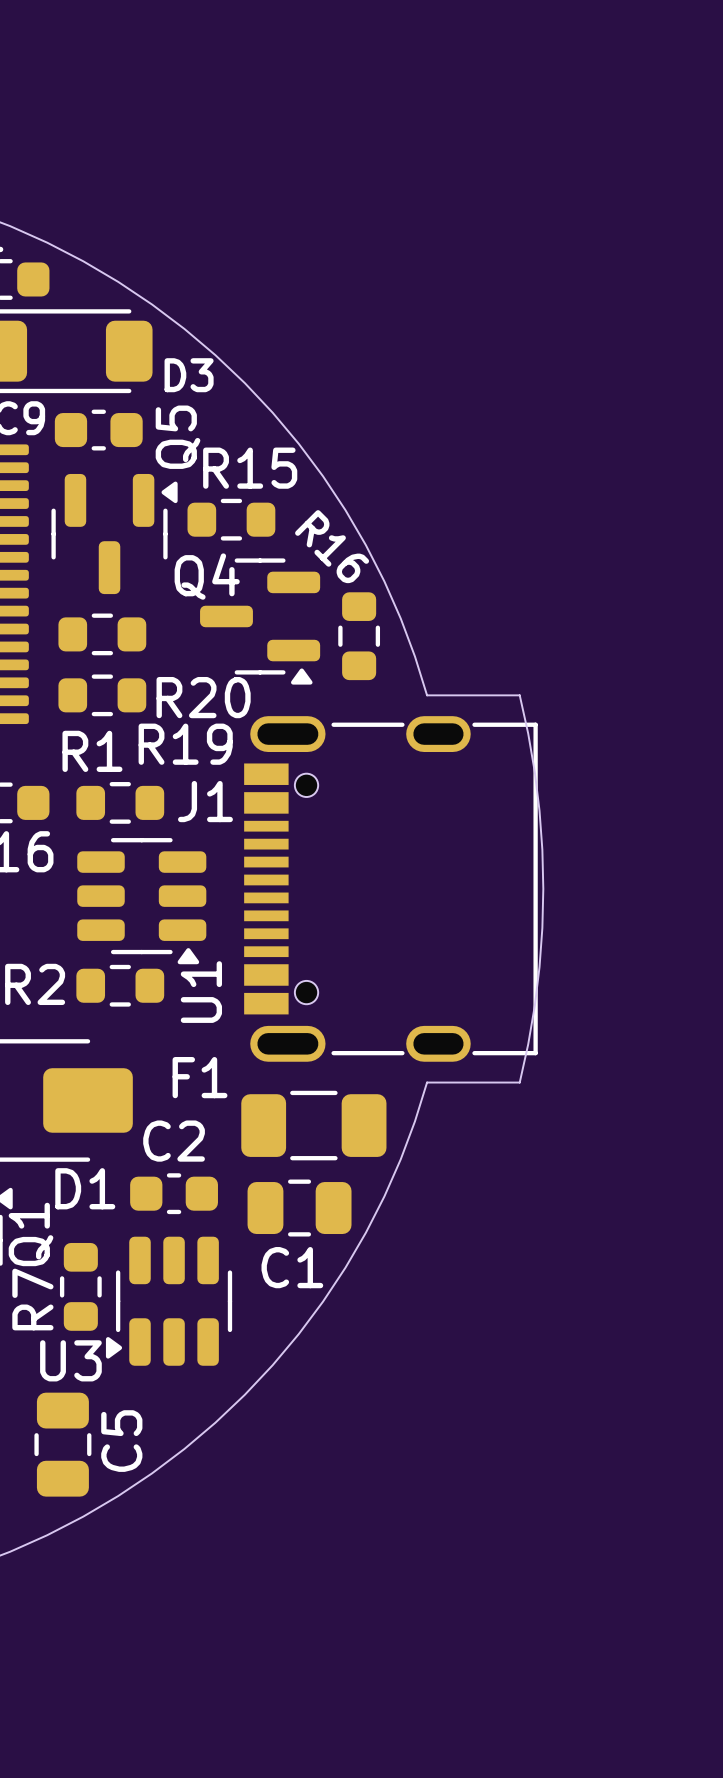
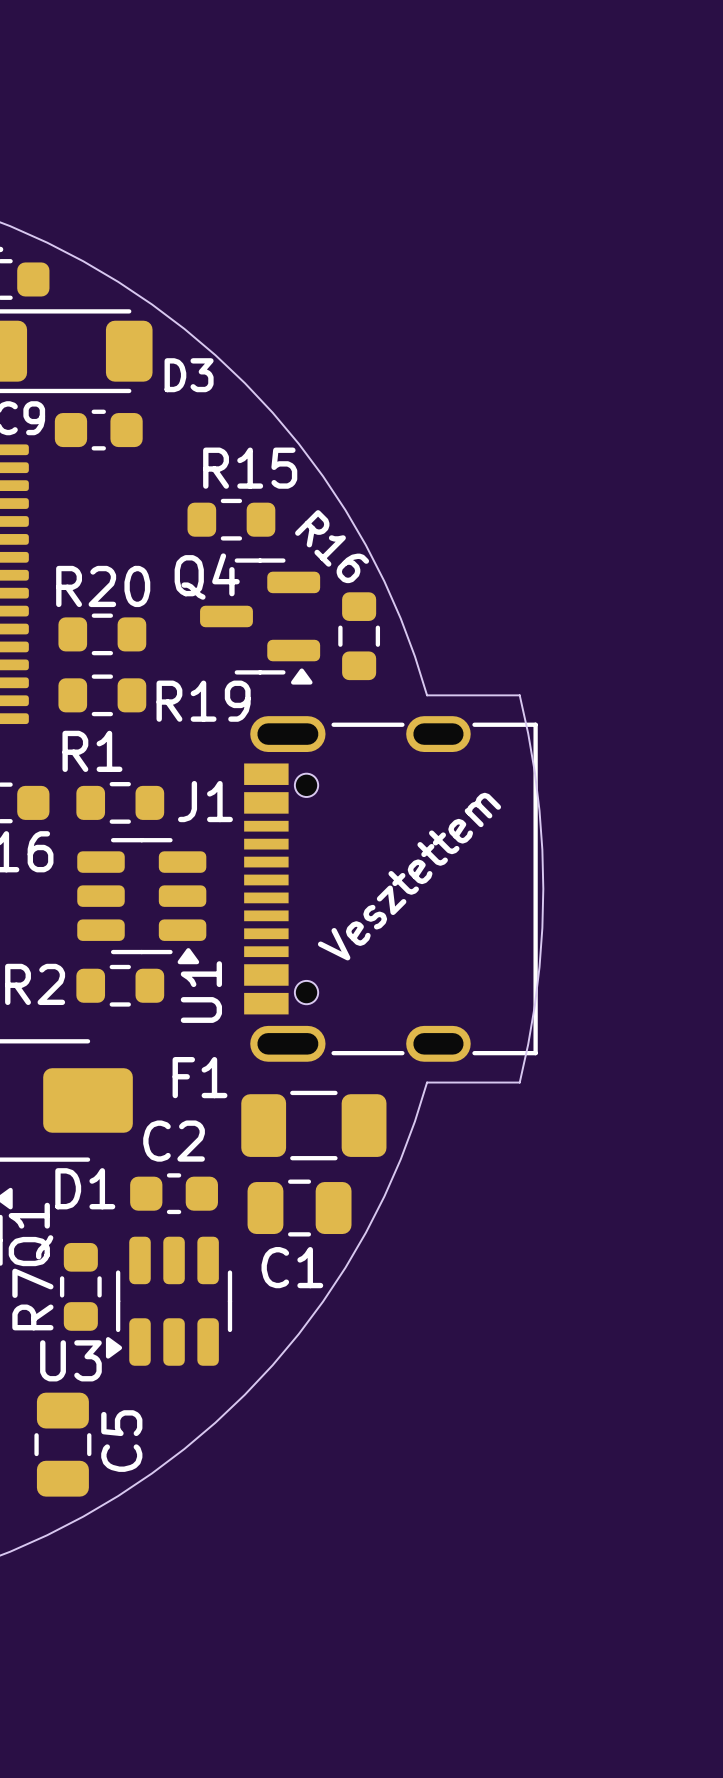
Q5: (114, 534) -> none
R20 name position: R20 (203, 697) -> R20 (103, 586)
R19 name position: R19 (185, 744) -> R19 (203, 701)
text: none -> Vesztettem (409, 876)

